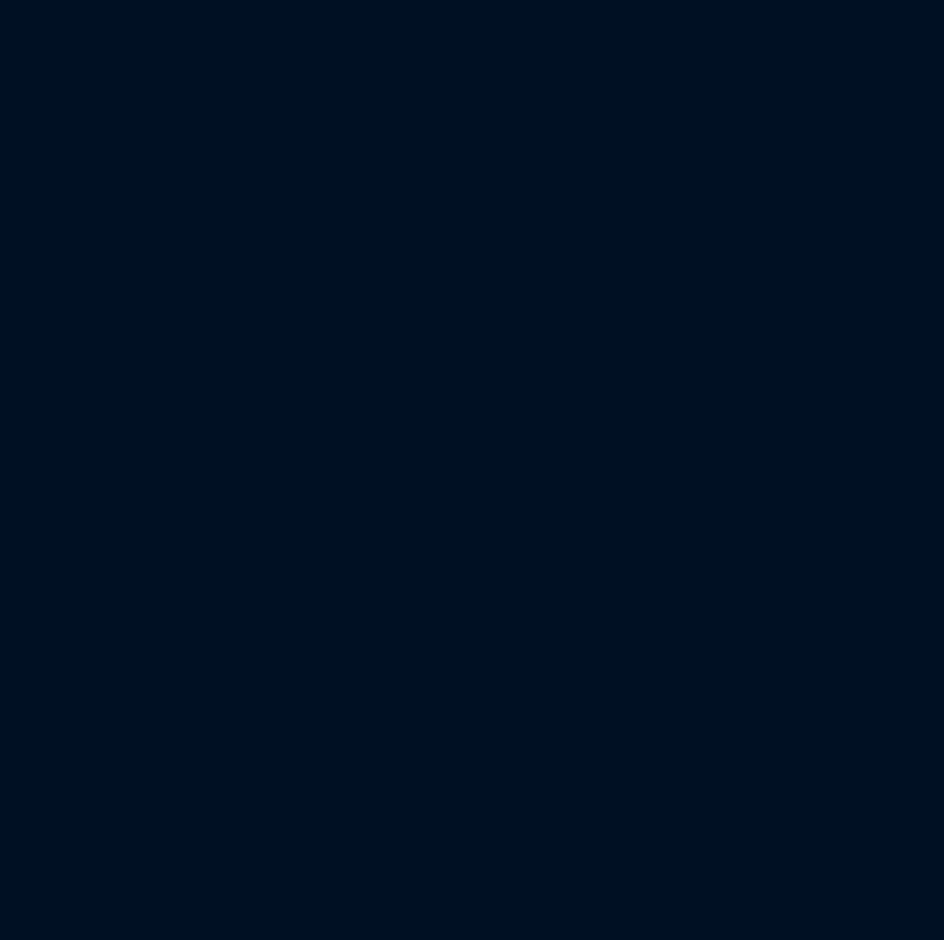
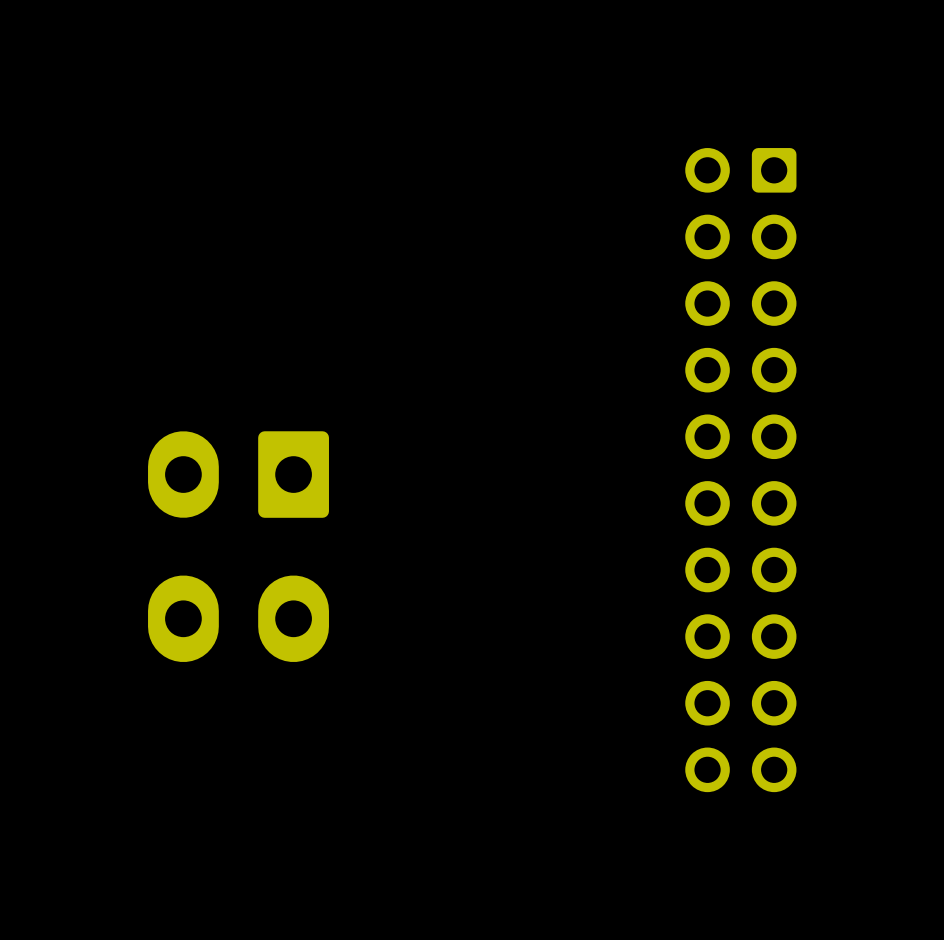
part: none -> (740, 470)
part: none -> (238, 546)

